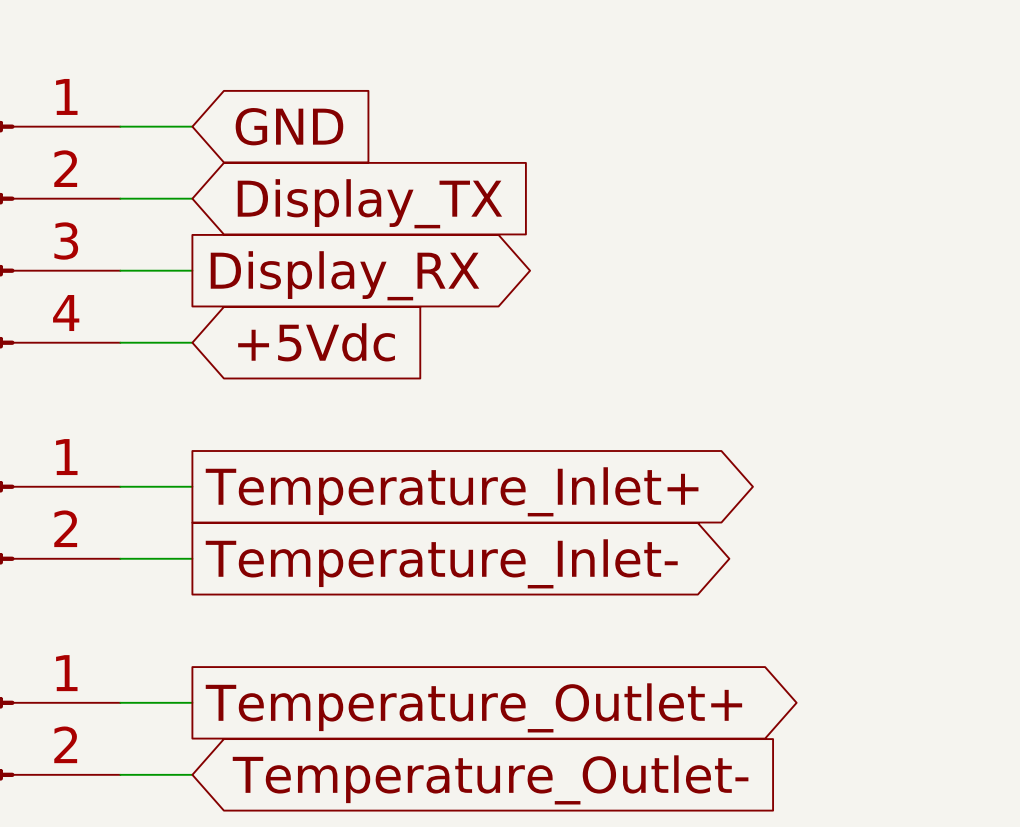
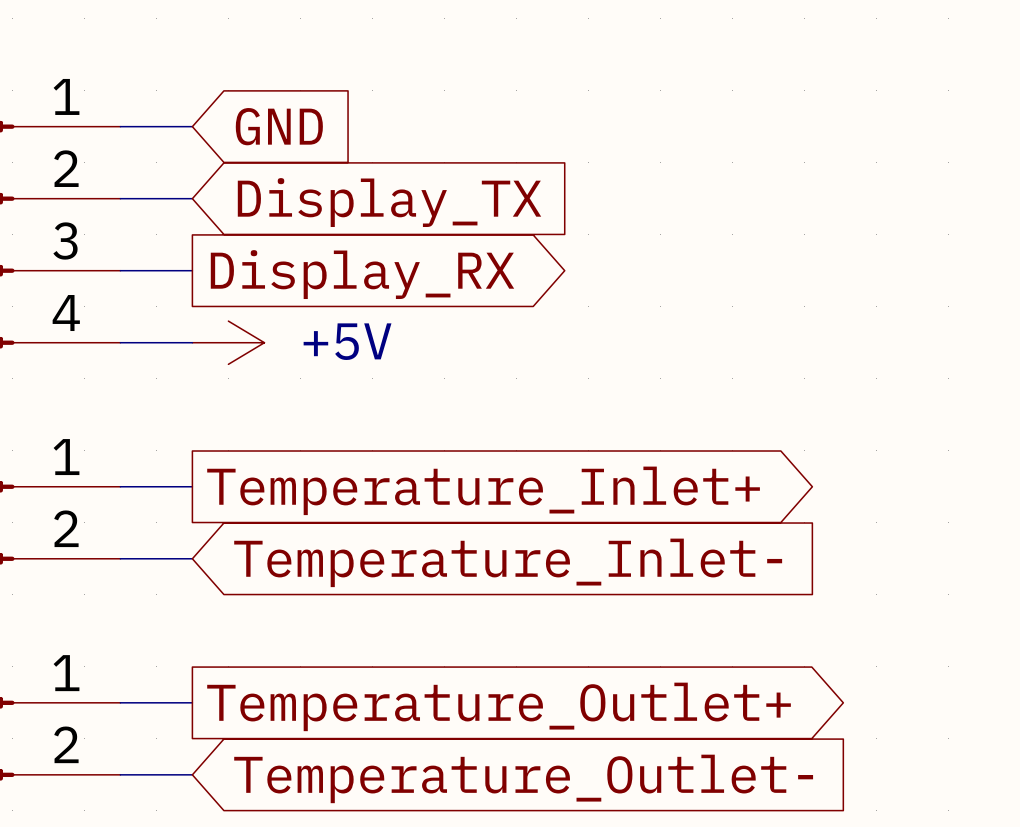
power symbol: none -> +5V (228, 342)
global label: +5Vdc (316, 342) -> none
global label shape: output (441, 563) -> input (508, 562)

